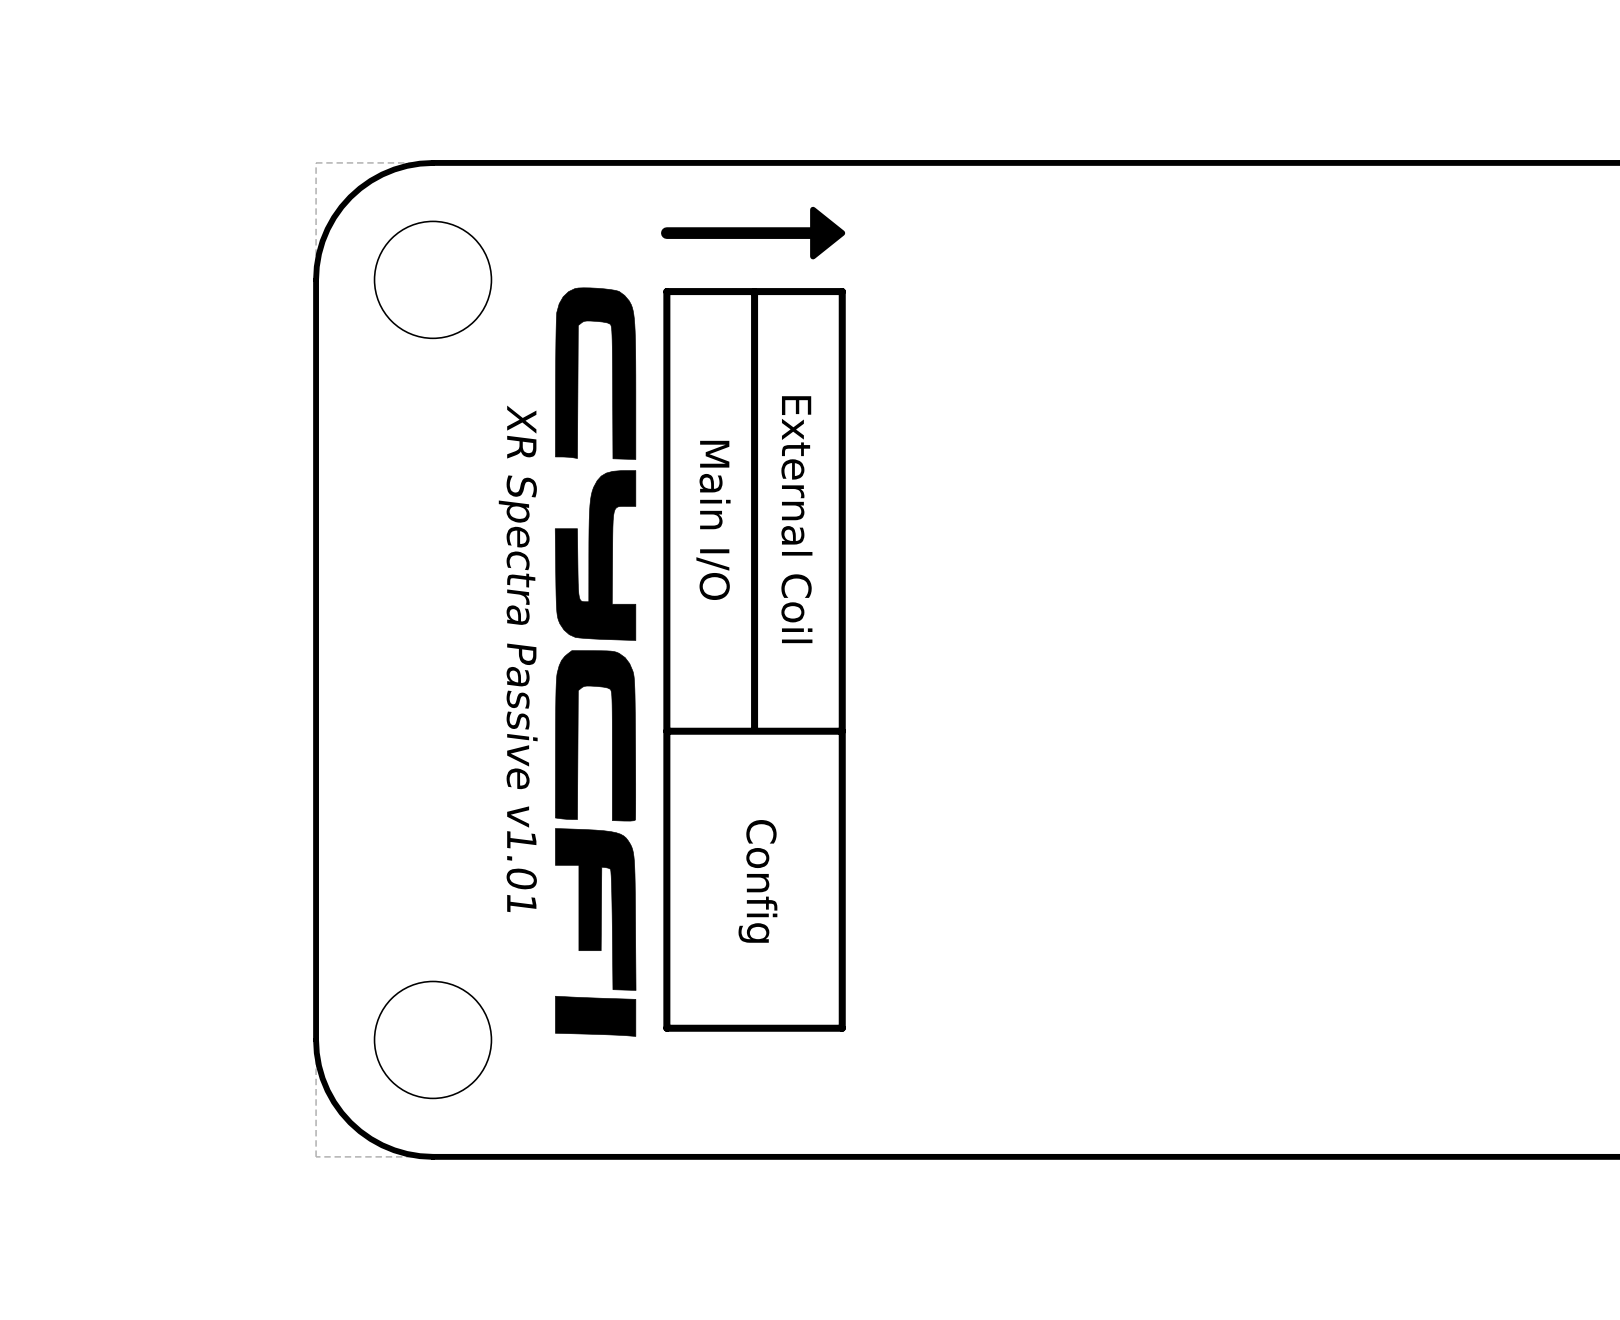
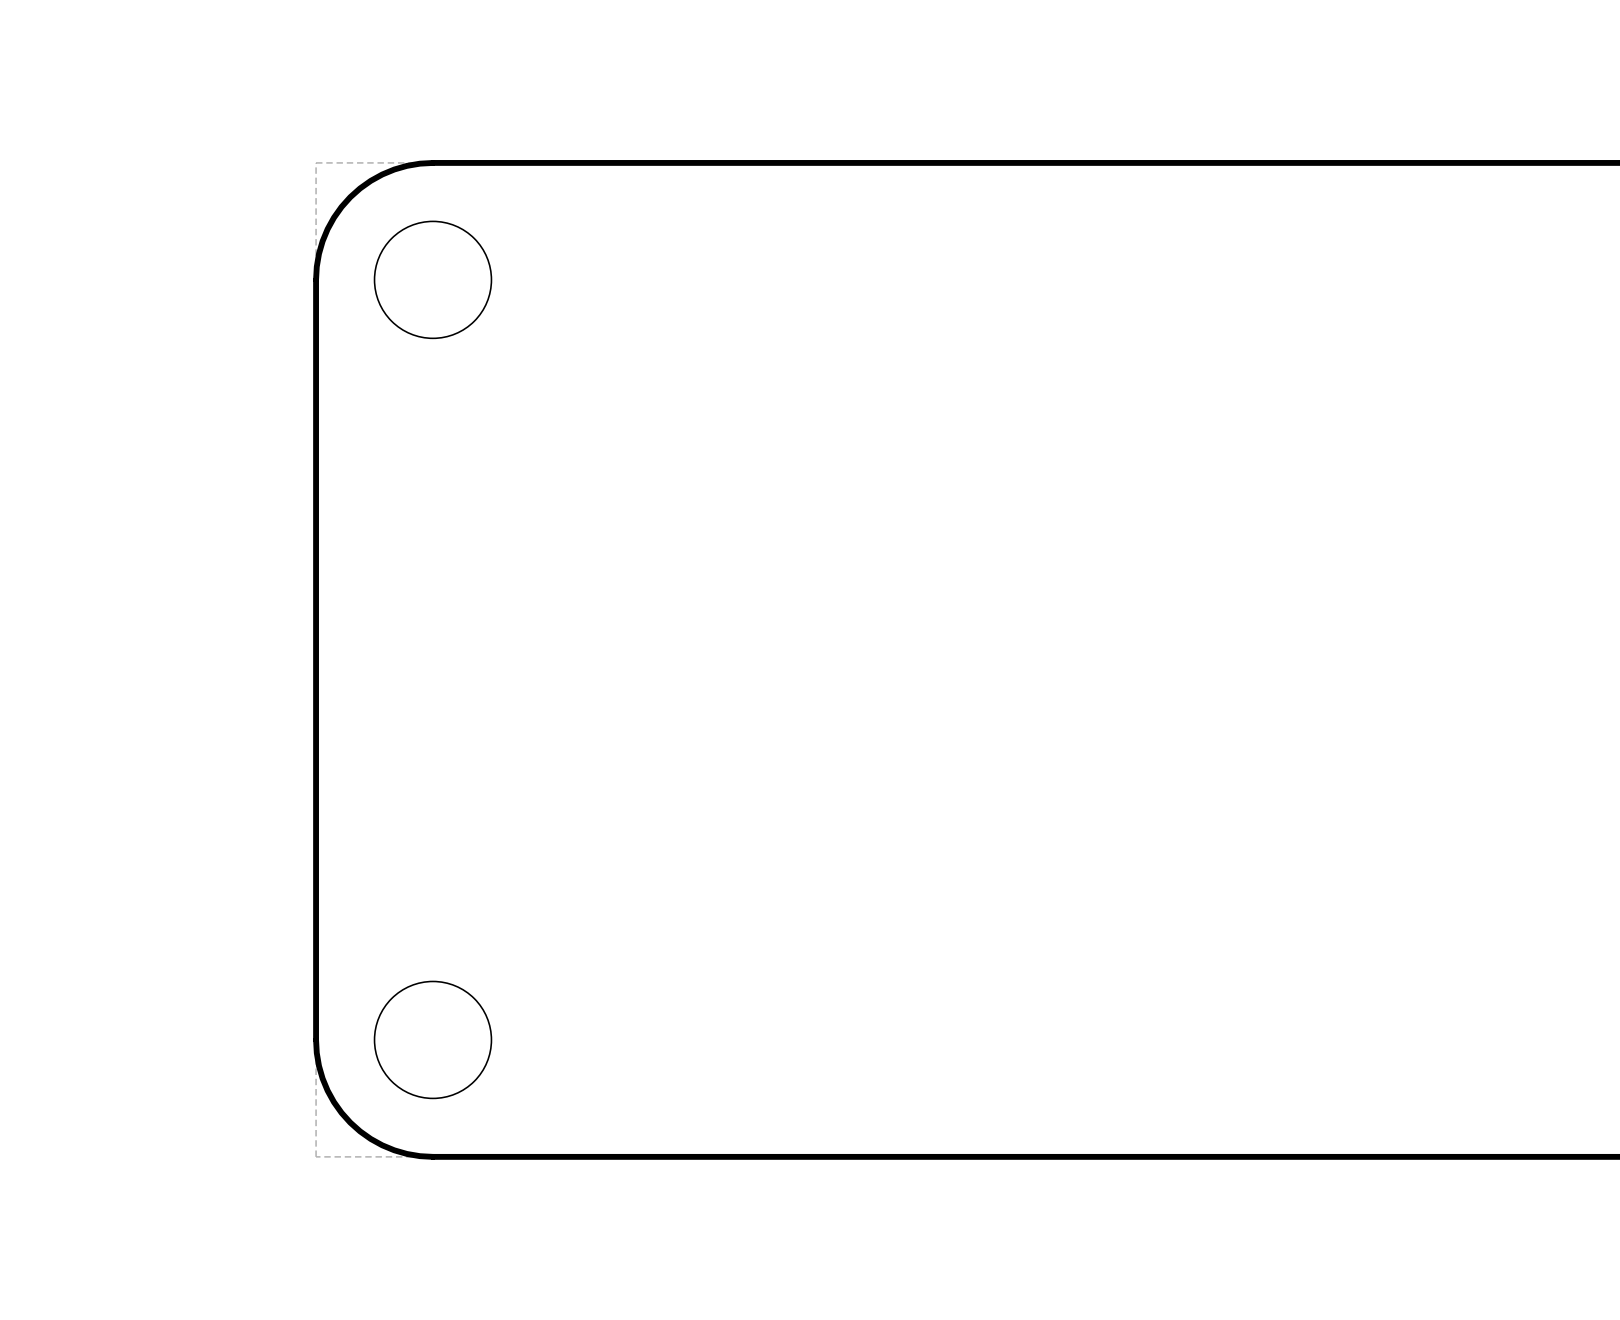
drawing: [810, 206, 846, 260] -> none
line: (666, 233) (824, 233) -> none
drawing: [554, 287, 637, 1037] -> none
line: (666, 291) (666, 1028) (842, 1028) (842, 291) (666, 291) -> none
line: (754, 291) (754, 730) -> none
text: External Coil (796, 519) -> none
text: Main I/O (713, 520) -> none
text: XR Spectra Passive v1.01 (518, 658) -> none
line: (666, 731) (842, 731) -> none
text: Config (757, 881) -> none

